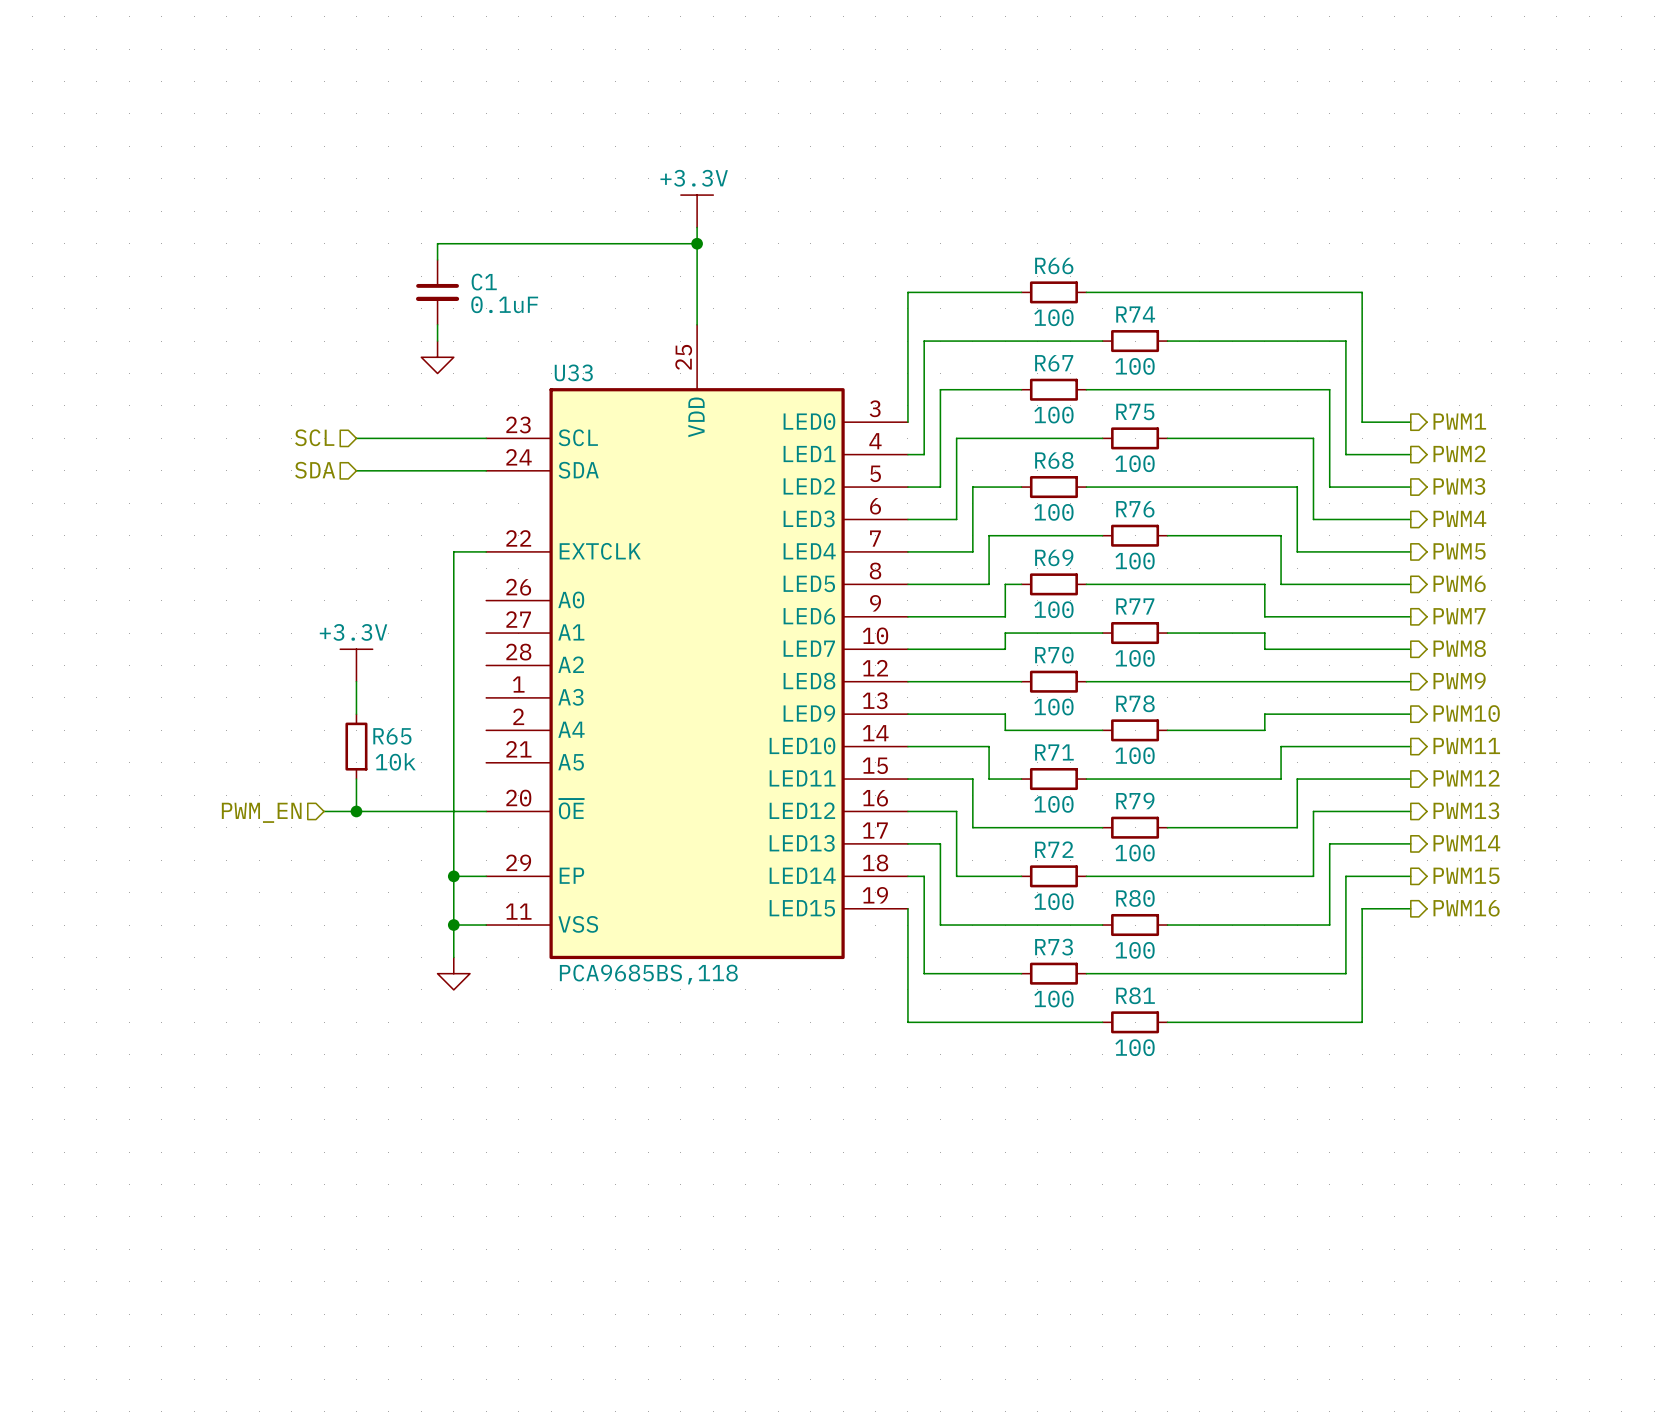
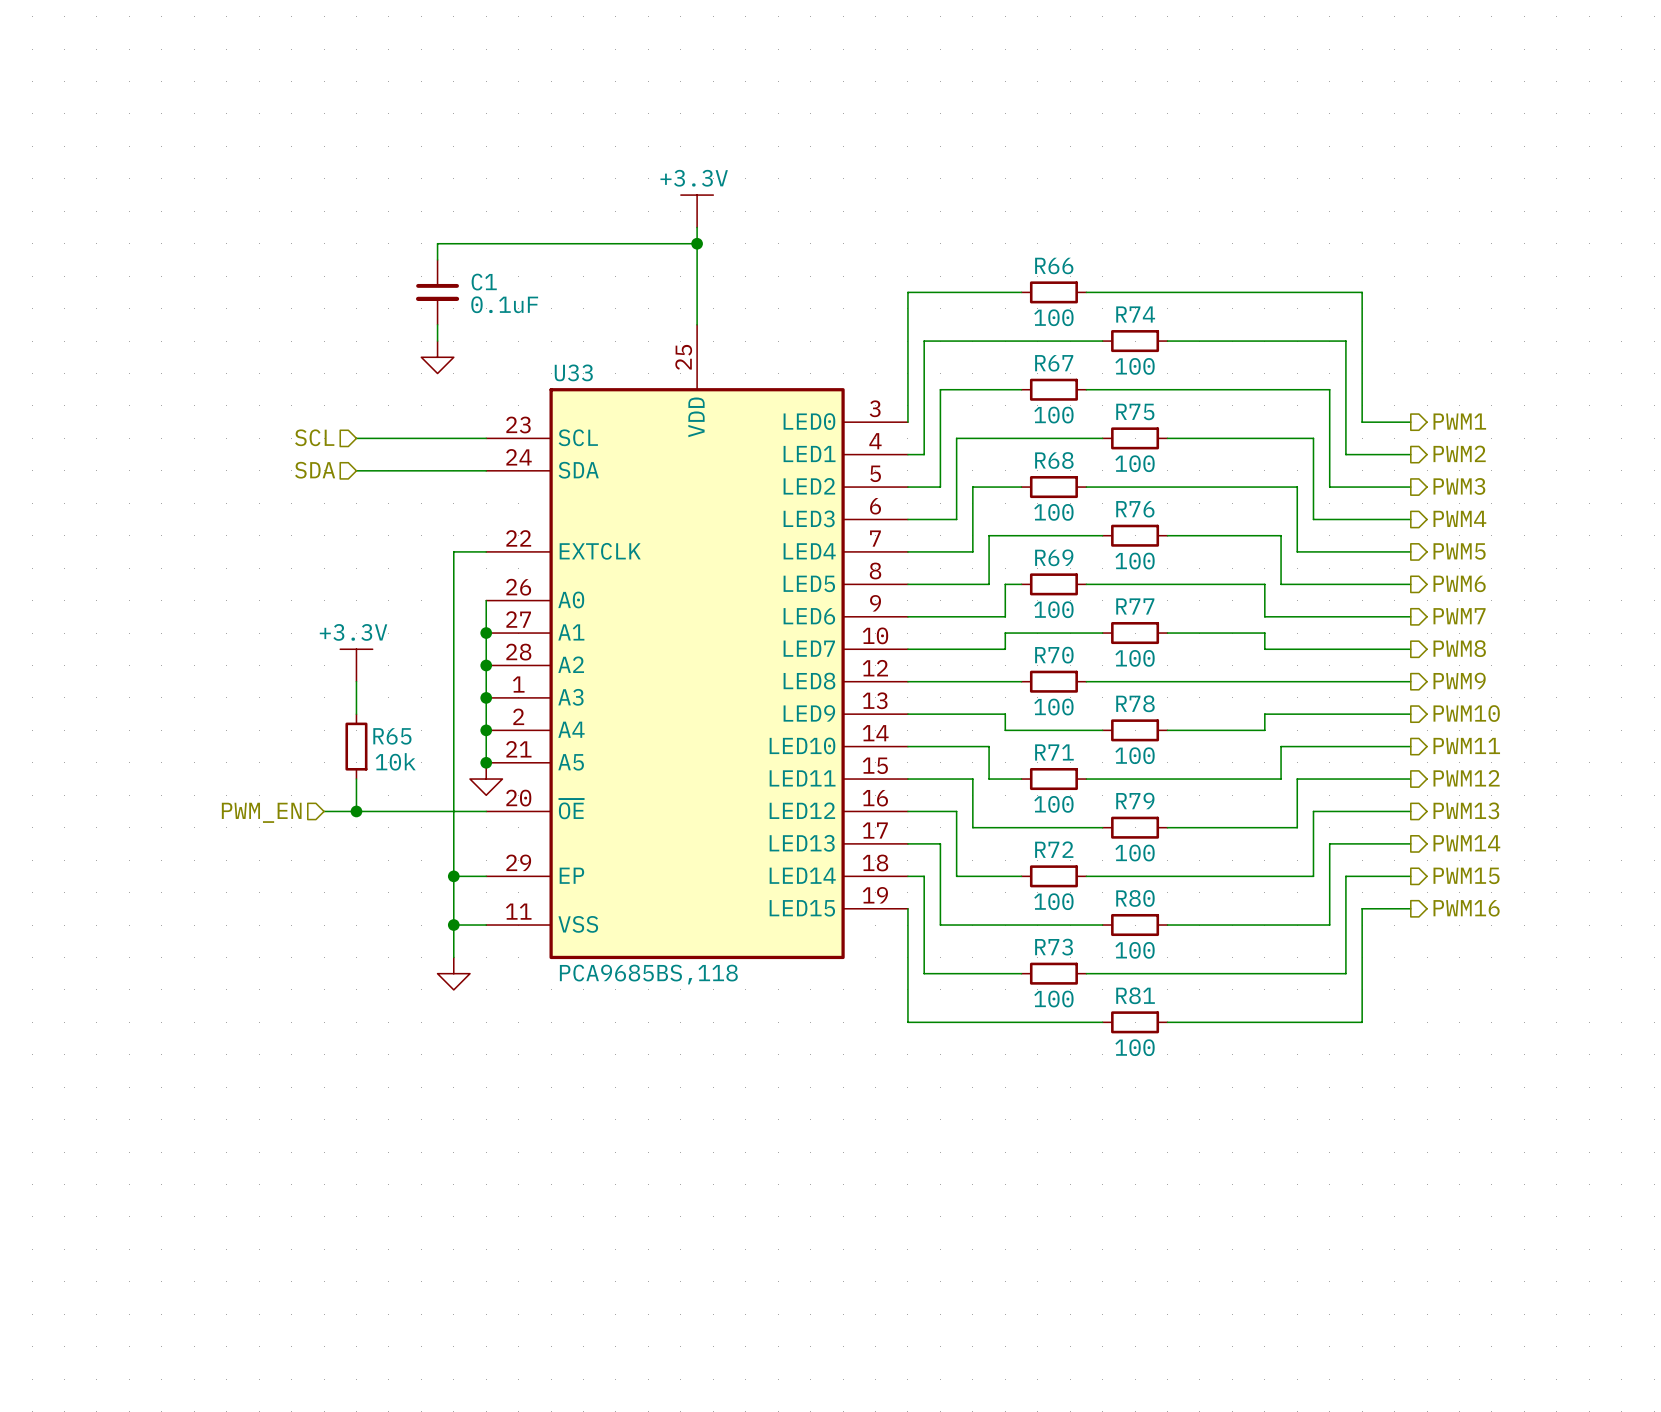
wire: none -> (486, 600) (486, 762)
junction: none -> (486, 633)
junction: none -> (486, 665)
junction: none -> (486, 697)
junction: none -> (486, 730)
junction: none -> (486, 762)
power symbol: none -> (486, 779)

